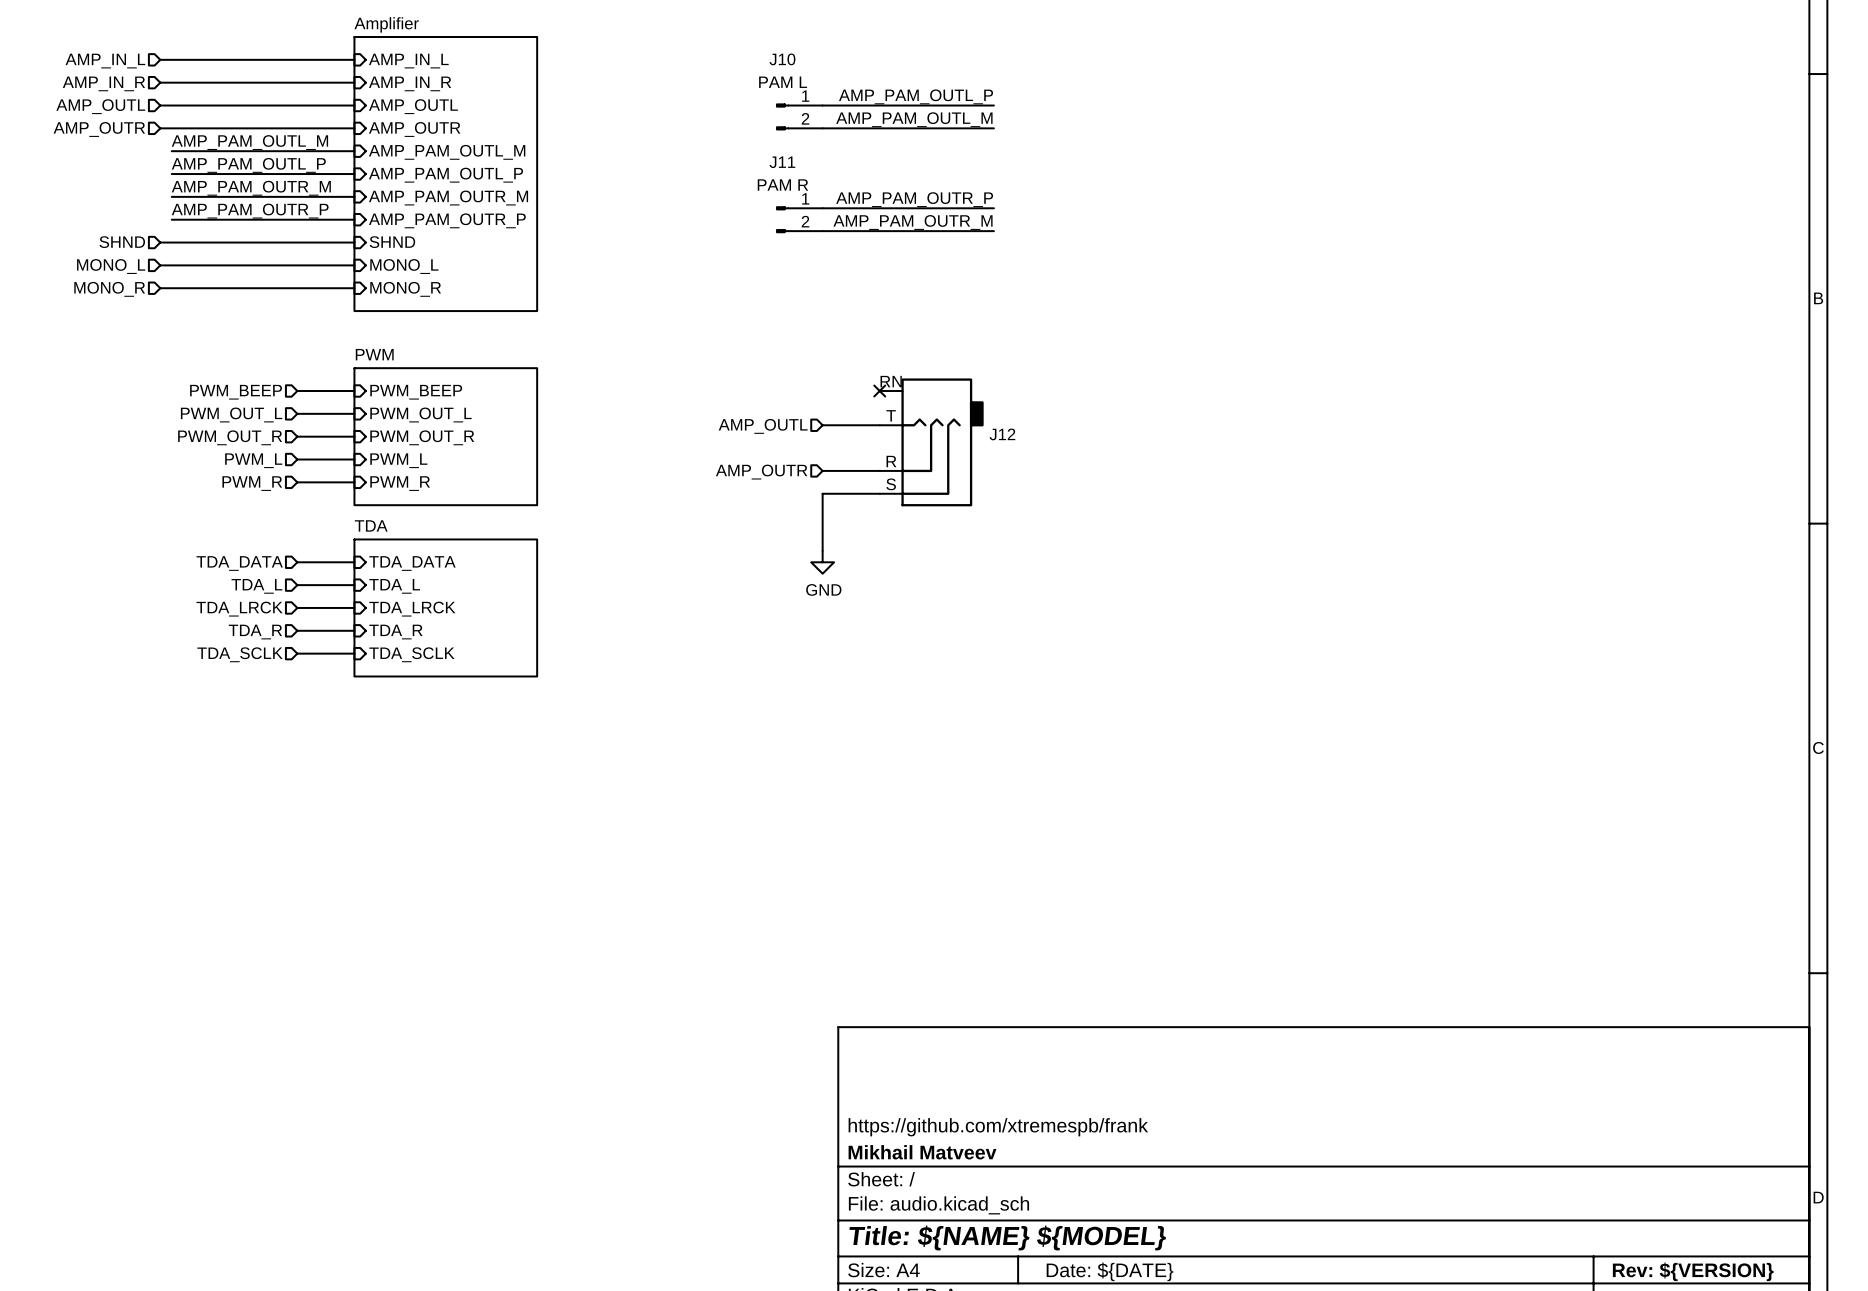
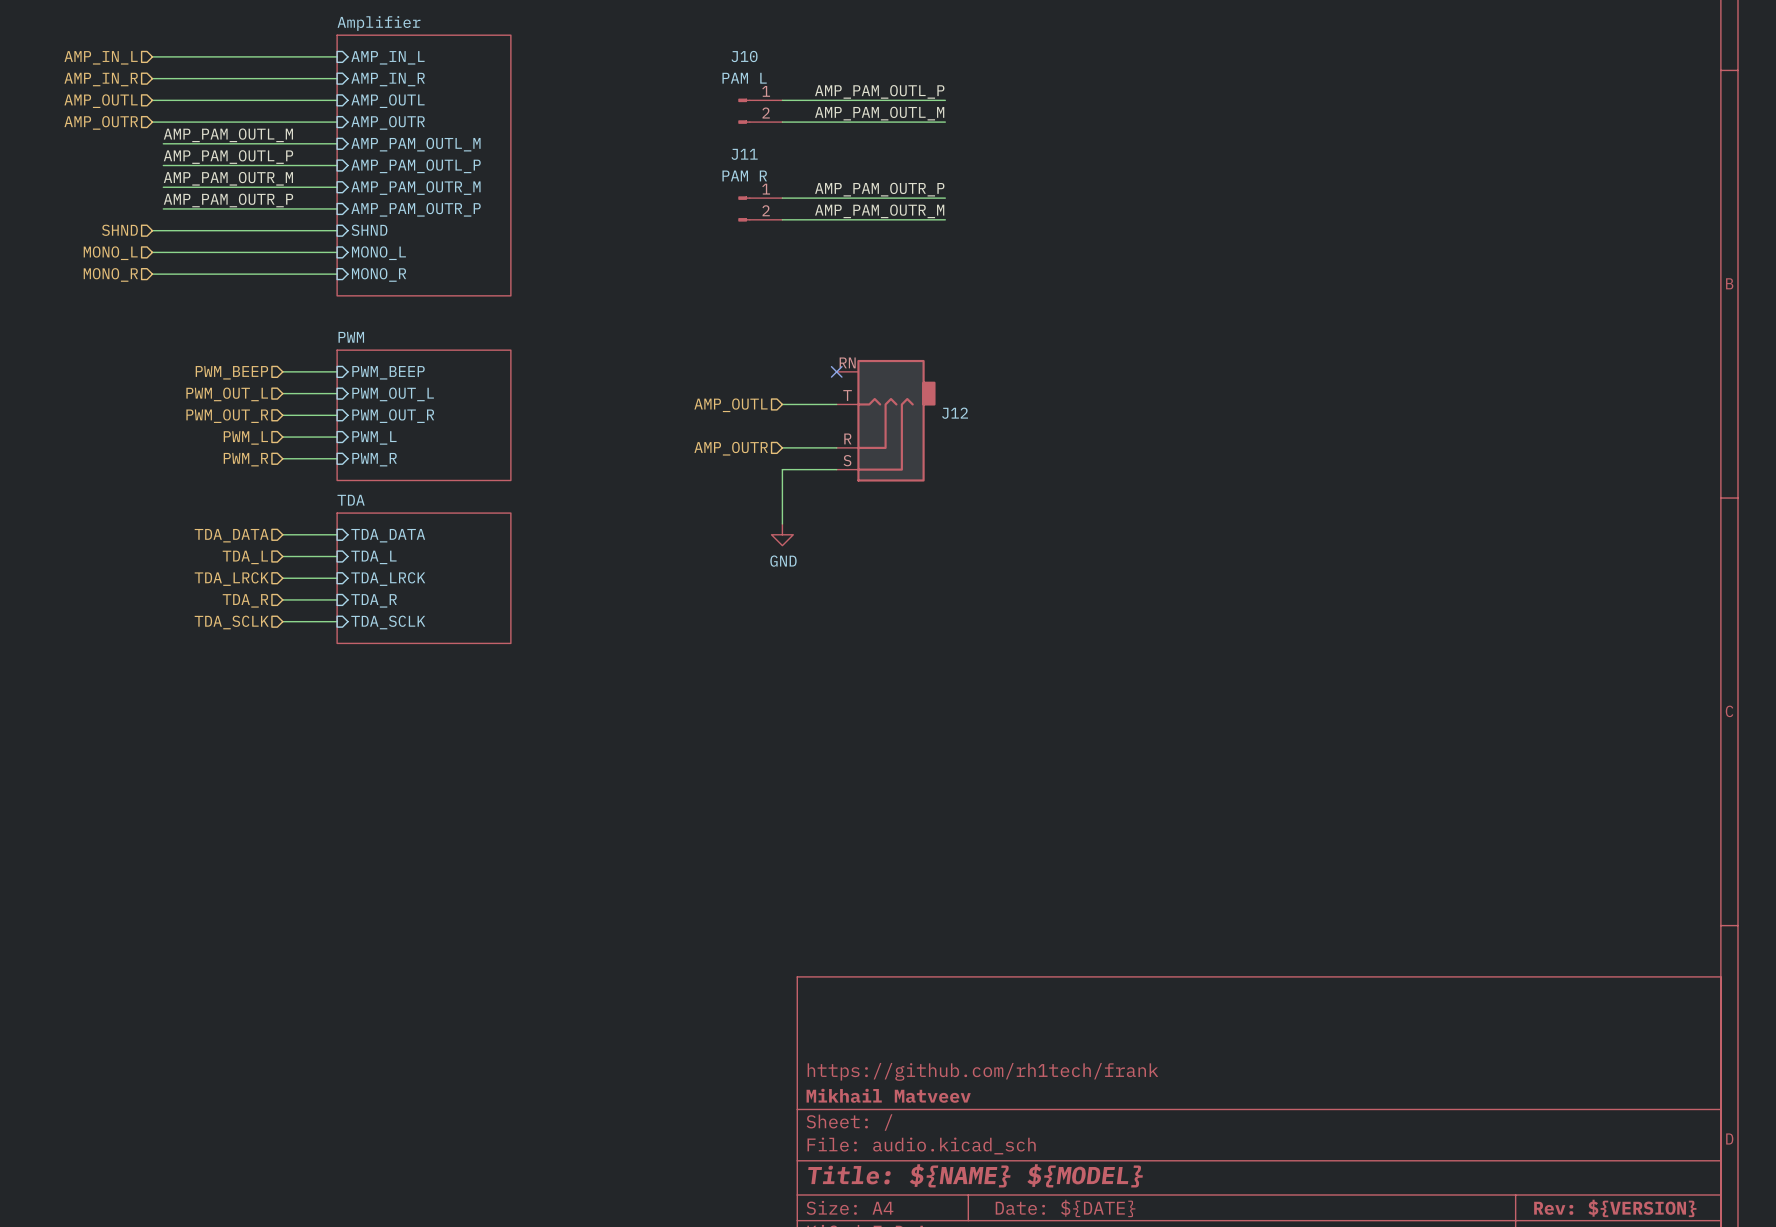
title block: https://github.com/xtremespb/frank (998, 1127) -> https://github.com/rh1tech/frank (982, 1071)

